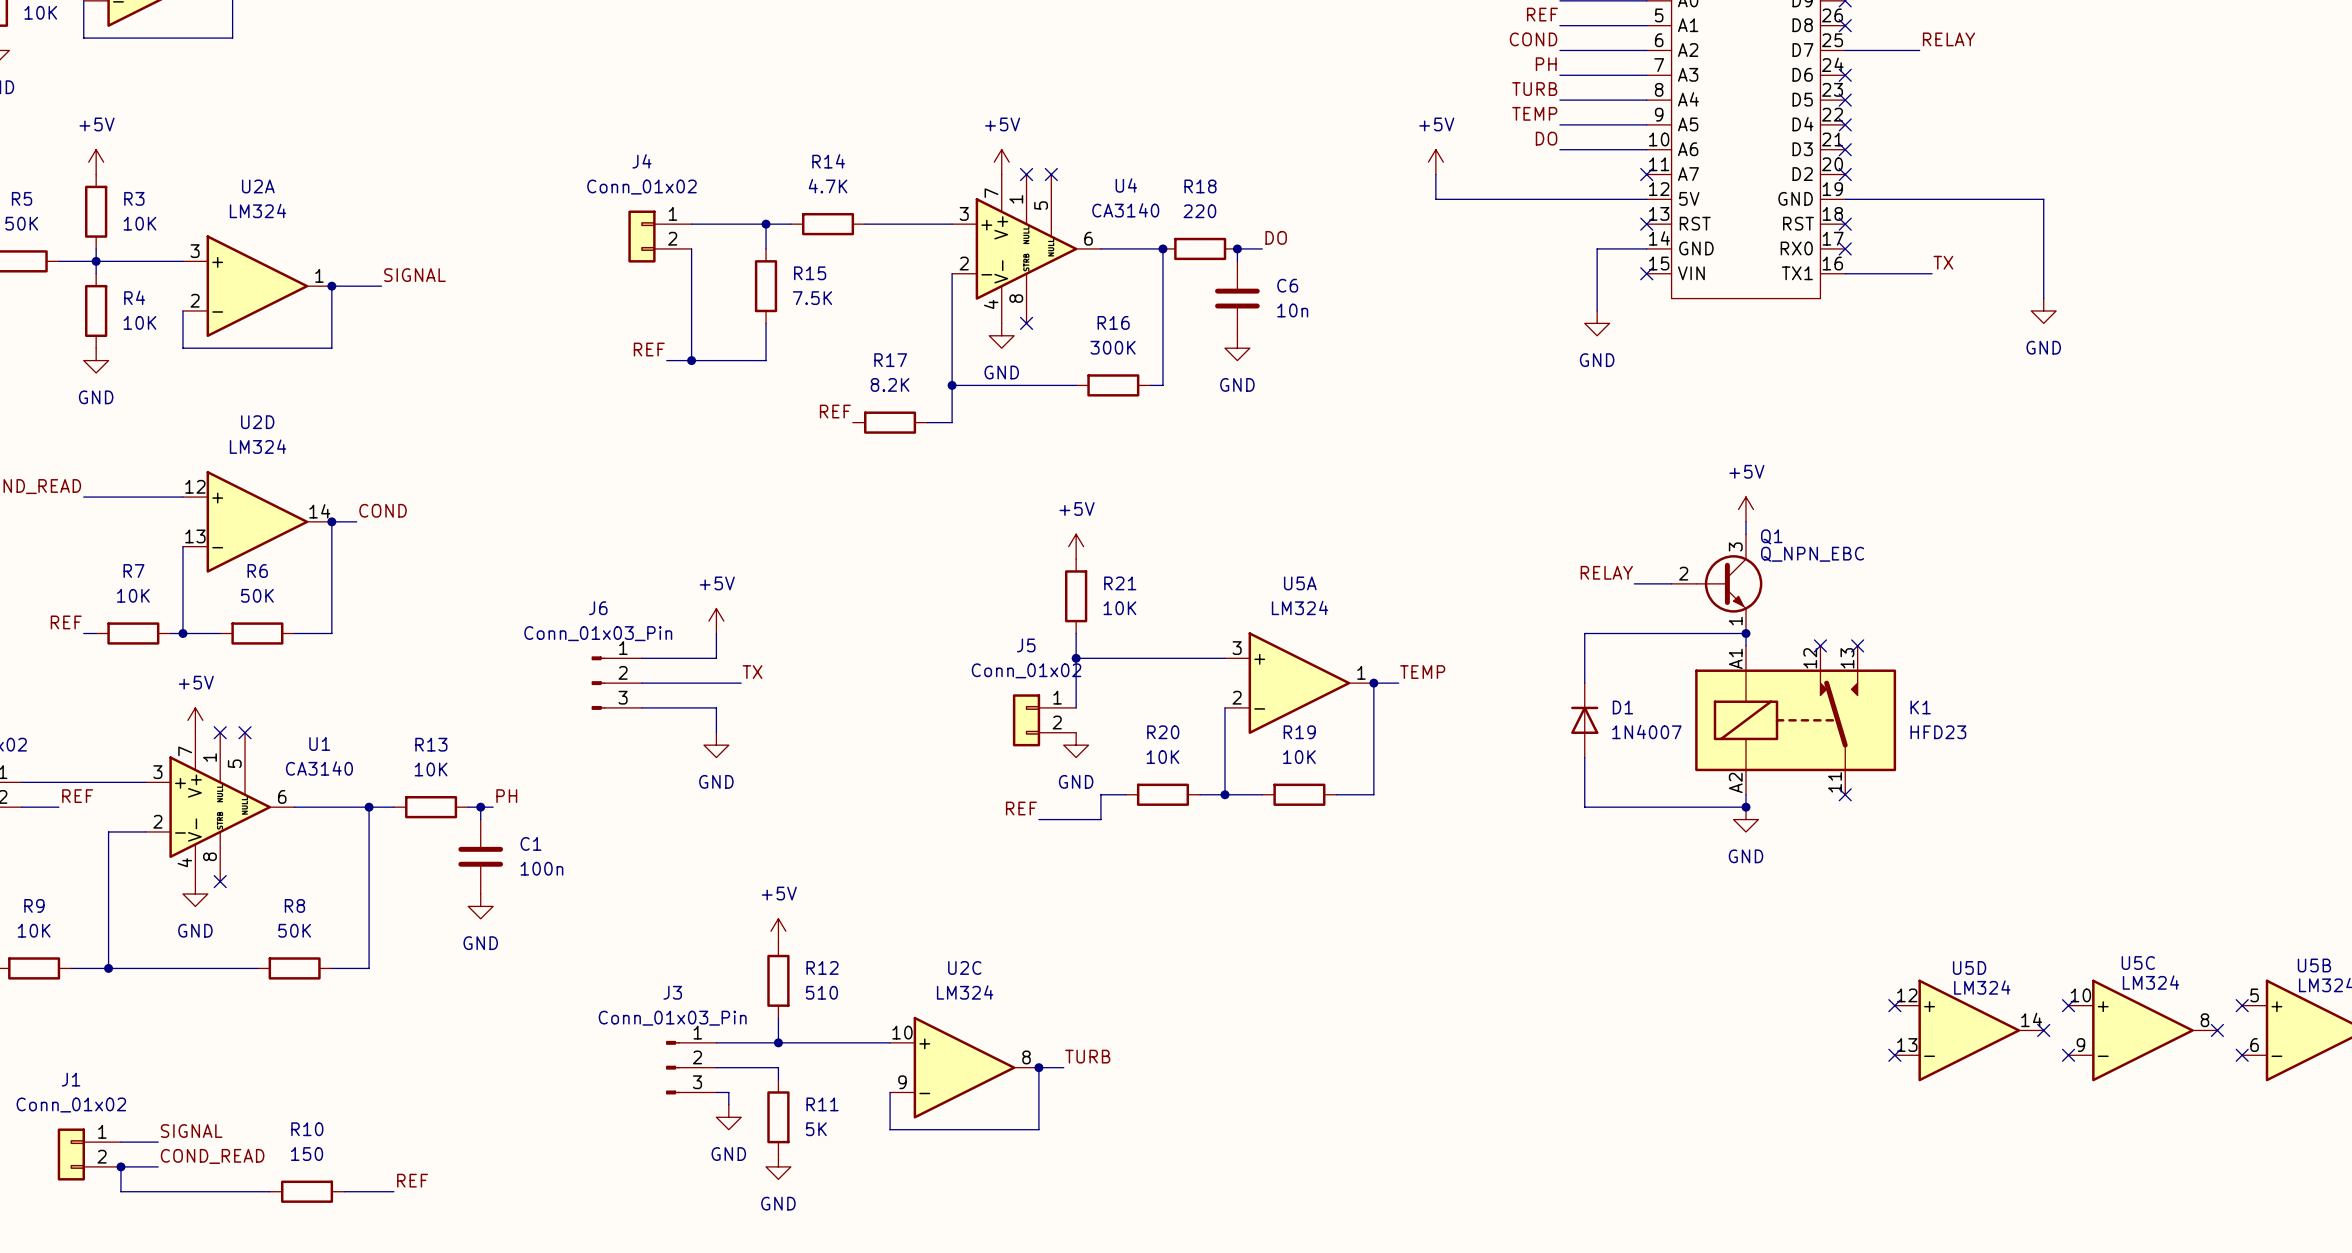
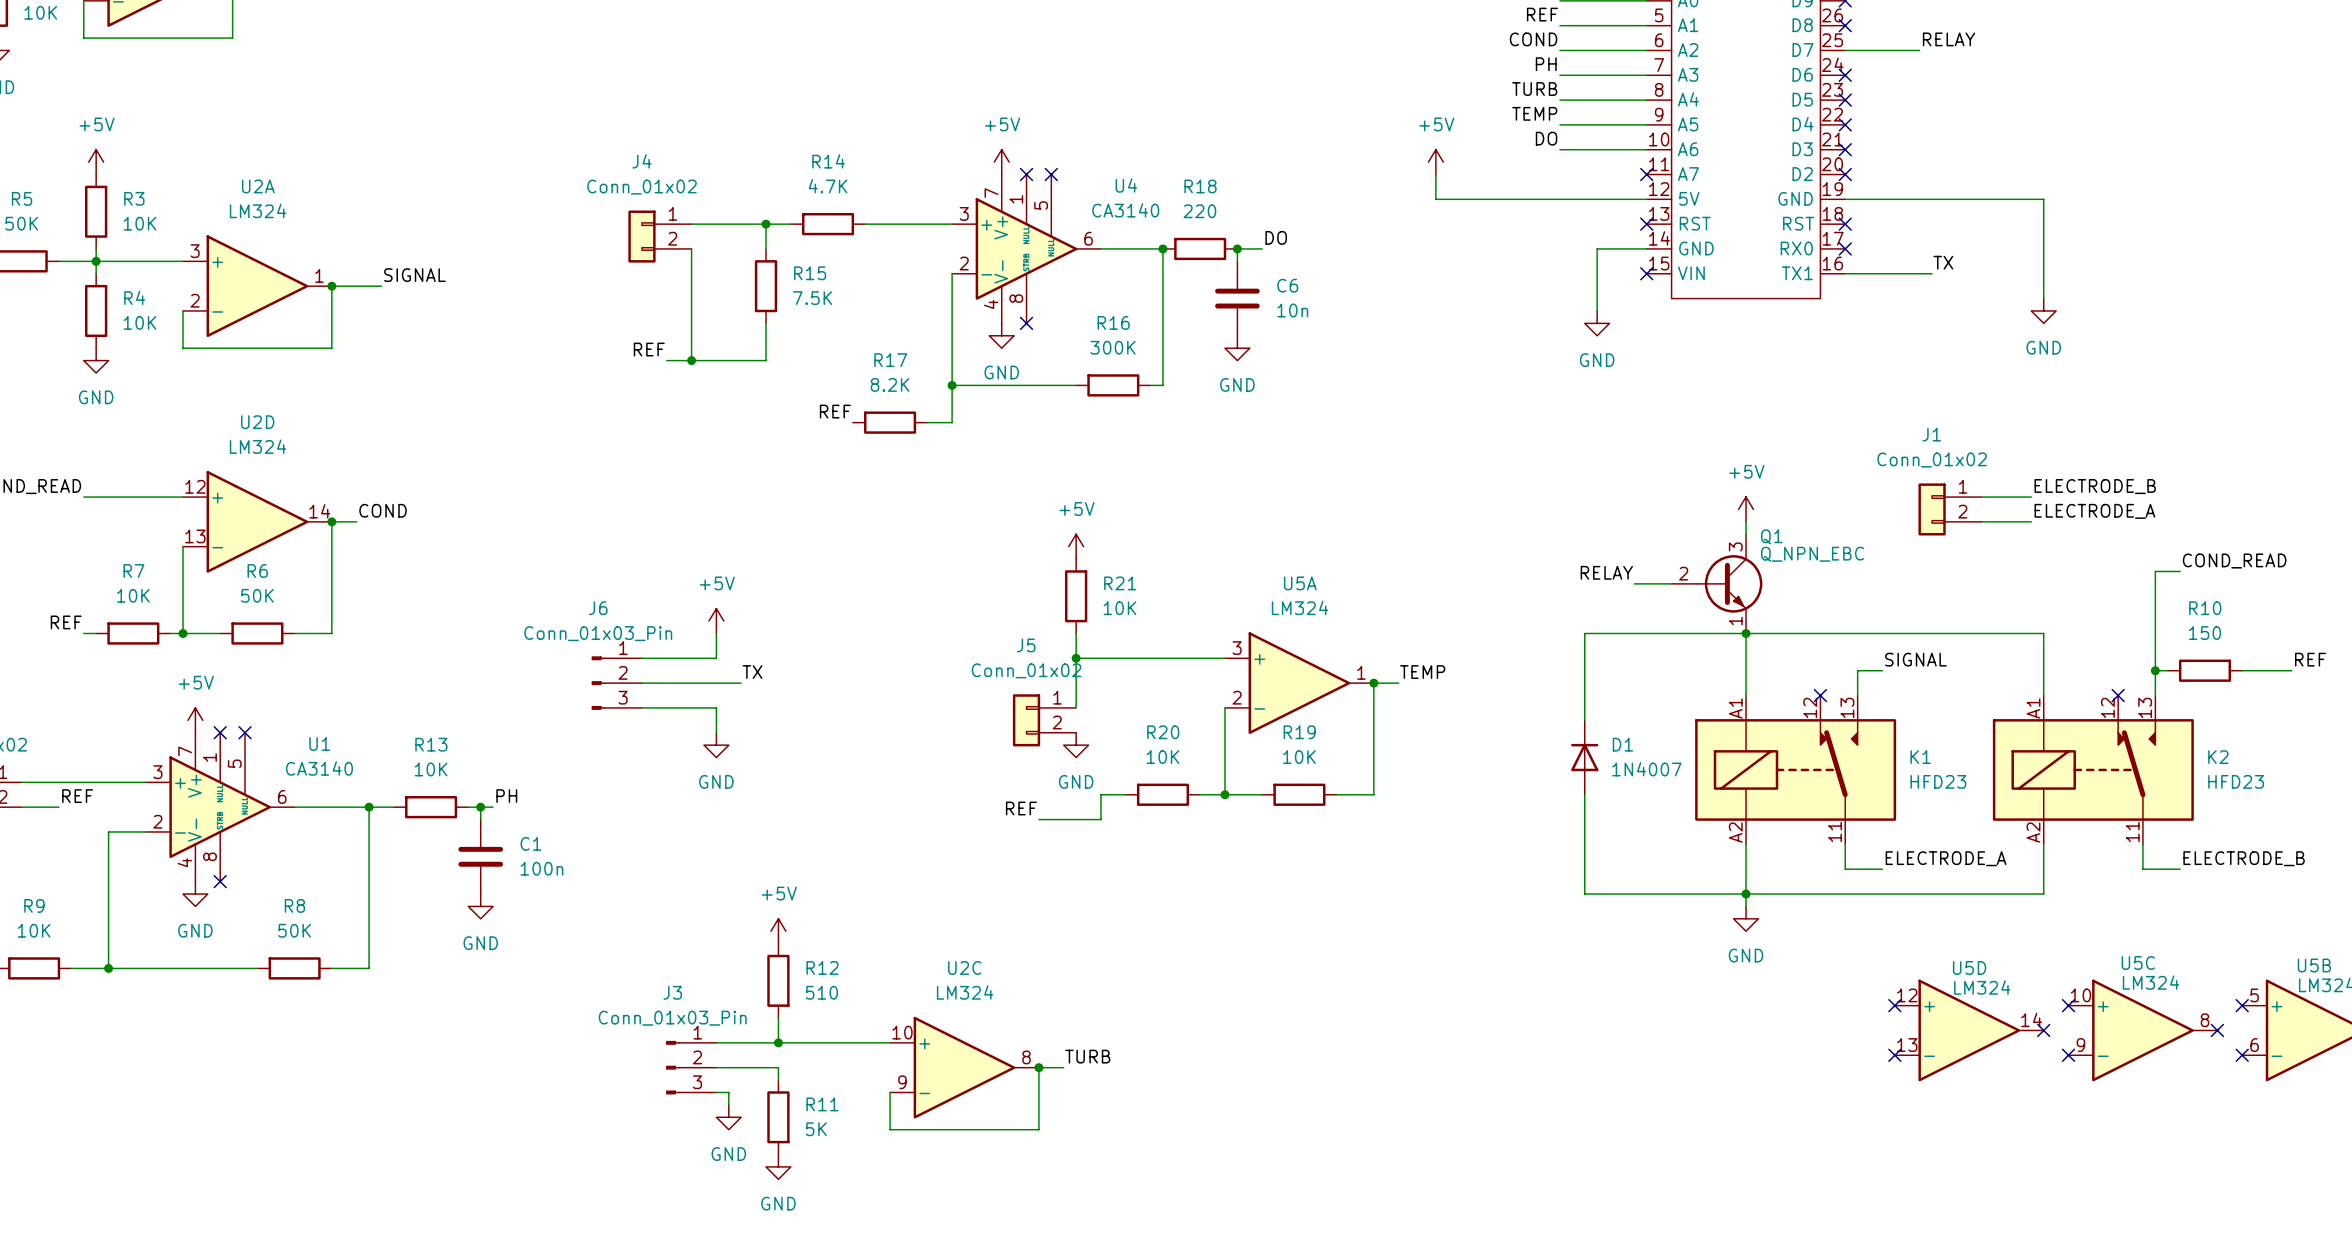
label: none -> ELECTRODE_B (2095, 486)
wire: none -> (1981, 497) (2031, 497)
label: none -> ELECTRODE_A (2094, 511)
wire: none -> (1981, 521) (2031, 521)
label: none -> COND_READ (2234, 561)
wire: none -> (2180, 571) (2155, 571) (2155, 695)
wire: none -> (1746, 633) (2043, 633) (2043, 695)
no-connect mark: (1820, 645) -> none
no-connect mark: (1857, 645) -> none
label: none -> SIGNAL (1915, 659)
label: none -> REF (2310, 659)
wire: none -> (2155, 670) (2167, 670)
junction: none -> (2155, 670)
wire: none -> (2242, 670) (2291, 670)
no-connect mark: none -> (1820, 695)
no-connect mark: none -> (2118, 695)
D1 position: (1584, 720) -> (1584, 757)
K1 position: (1795, 720) -> (1795, 769)
K2: none -> HFD23 (2093, 769)
wire: (1746, 794) (1746, 807) (1584, 807) -> (2043, 844) (2043, 894) (1584, 894) (1584, 807)
no-connect mark: (1845, 794) -> none
junction: (1746, 807) -> none
power symbol position: GND (1746, 819) -> GND (1746, 918)
wire: none -> (1746, 844) (1746, 906)
wire: none -> (1845, 844) (1845, 869) (1882, 869)
wire: none -> (2142, 844) (2142, 869) (2180, 869)
label: none -> ELECTRODE_A (1946, 858)
label: none -> ELECTRODE_B (2244, 858)
junction: none -> (1746, 894)
label: SIGNAL (191, 1131) -> none
wire: (120, 1142) (158, 1142) -> none
J1 position: (89, 1154) -> (1950, 509)
label: COND_READ (212, 1156) -> none
junction: (120, 1166) -> none
wire: (158, 1166) (120, 1166) (120, 1191) (269, 1191) -> none
label: REF (412, 1180) -> none
R10 position: (307, 1191) -> (2204, 670)
wire: (344, 1191) (393, 1191) -> none

